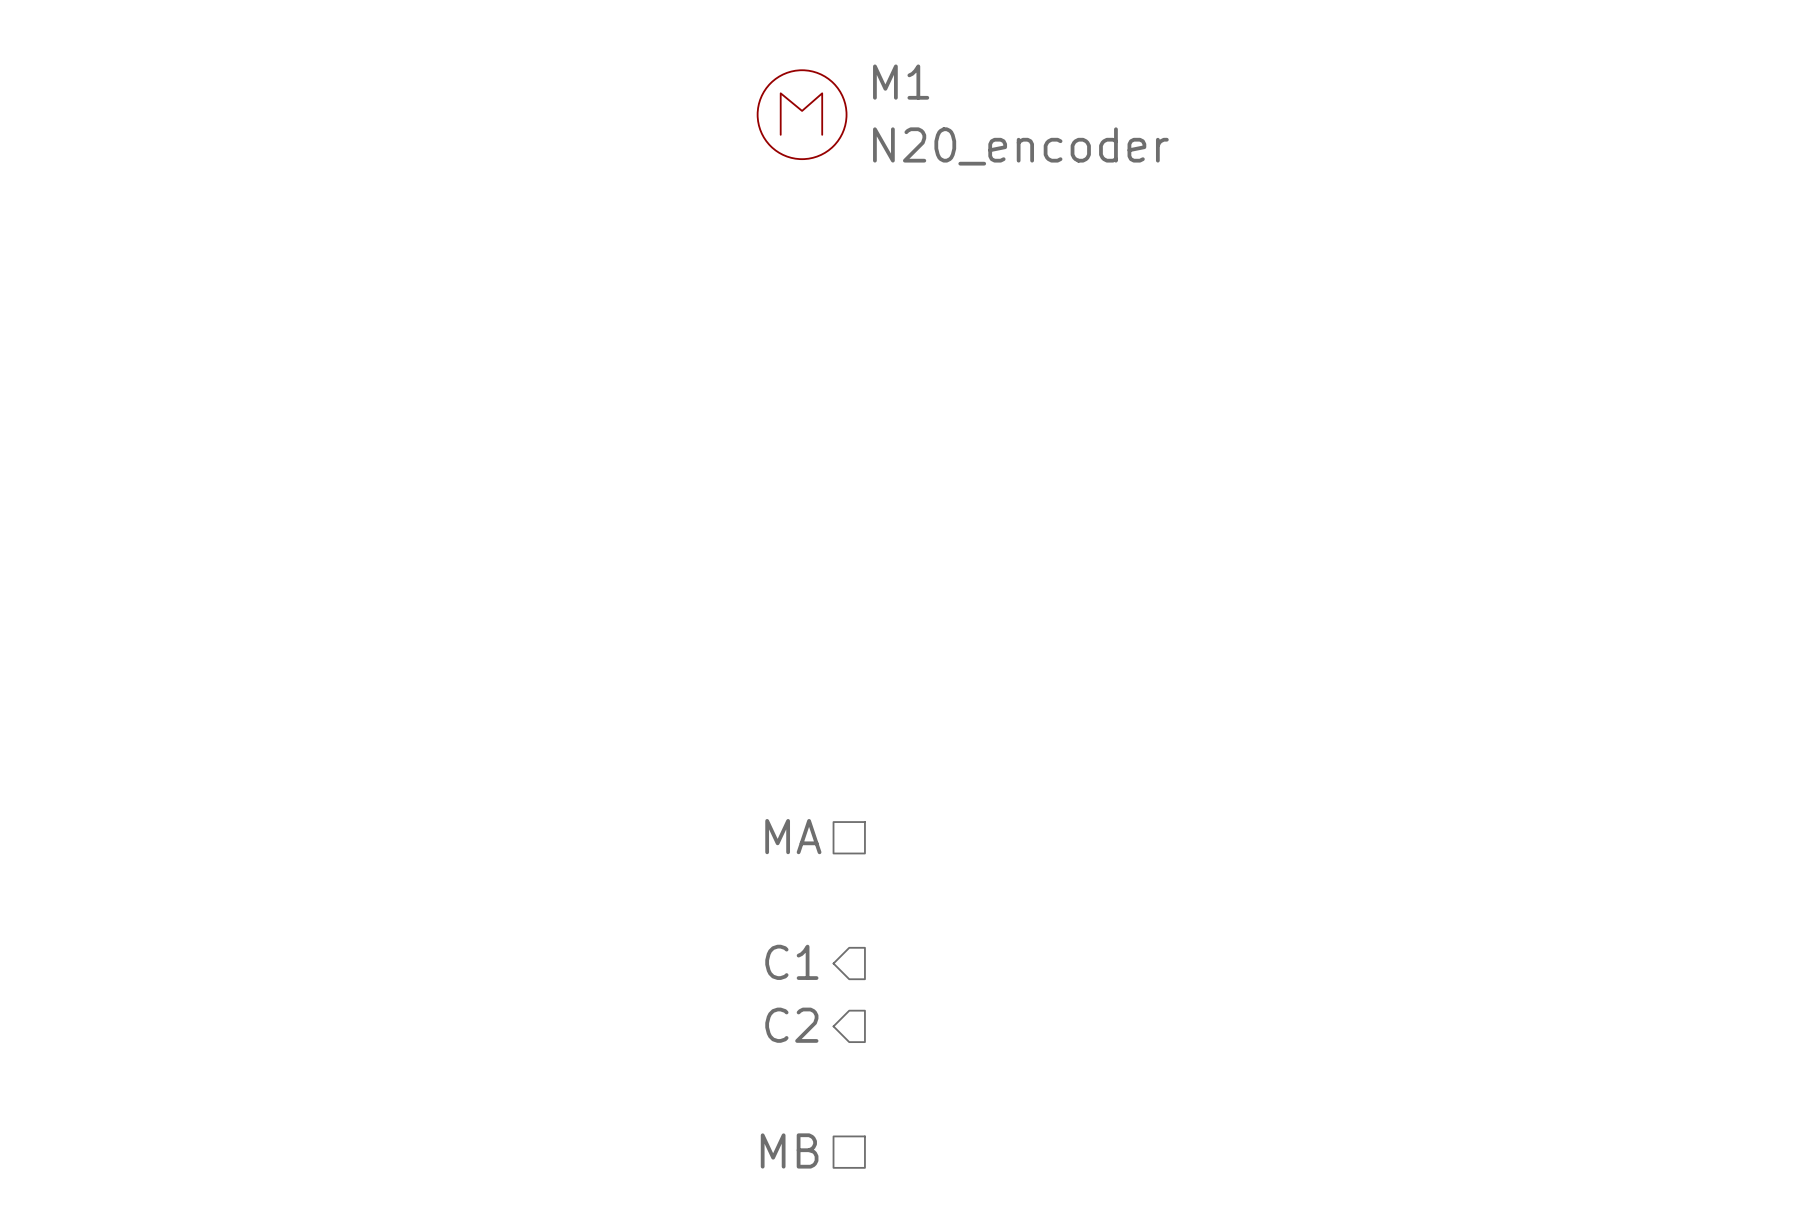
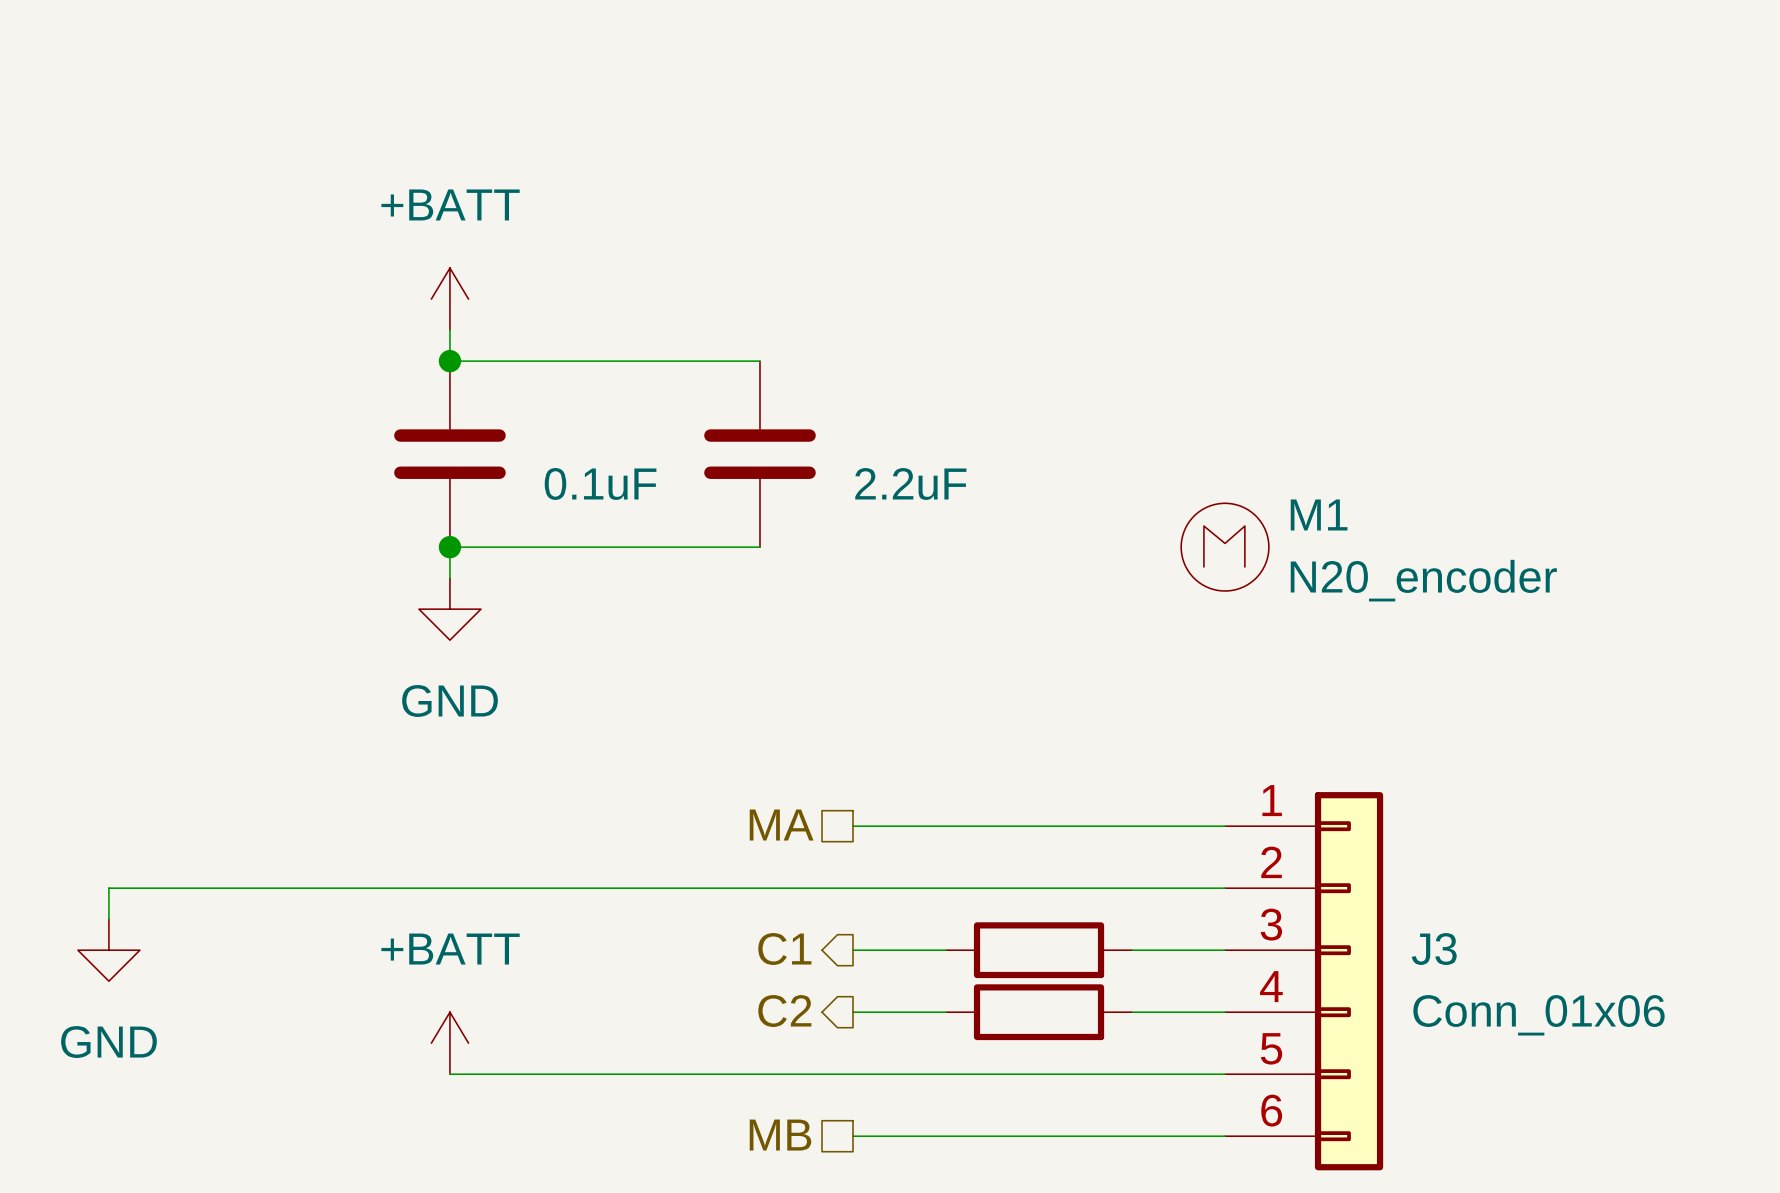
M1 position: (802, 114) -> (1225, 547)
power symbol: none -> +BATT (449, 299)
wire: none -> (449, 330) (449, 361) (759, 361)
junction: none -> (449, 361)
part: none -> 0.1uF (449, 454)
part: none -> 2.2uF (759, 454)
junction: none -> (449, 547)
wire: none -> (759, 547) (449, 547) (449, 578)
power symbol: none -> GND (449, 609)
wire: none -> (852, 826) (1225, 826)
wire: none -> (1225, 888) (108, 888) (108, 919)
power symbol: none -> GND (108, 950)
wire: none -> (852, 950) (946, 950)
part: none -> (1039, 950)
wire: none -> (1132, 950) (1225, 950)
J3: none -> Conn_01x06 (1304, 981)
wire: none -> (852, 1012) (946, 1012)
part: none -> (1039, 1012)
wire: none -> (1132, 1012) (1225, 1012)
power symbol: none -> +BATT (449, 1043)
wire: none -> (449, 1074) (1225, 1074)
wire: none -> (852, 1136) (1225, 1136)

